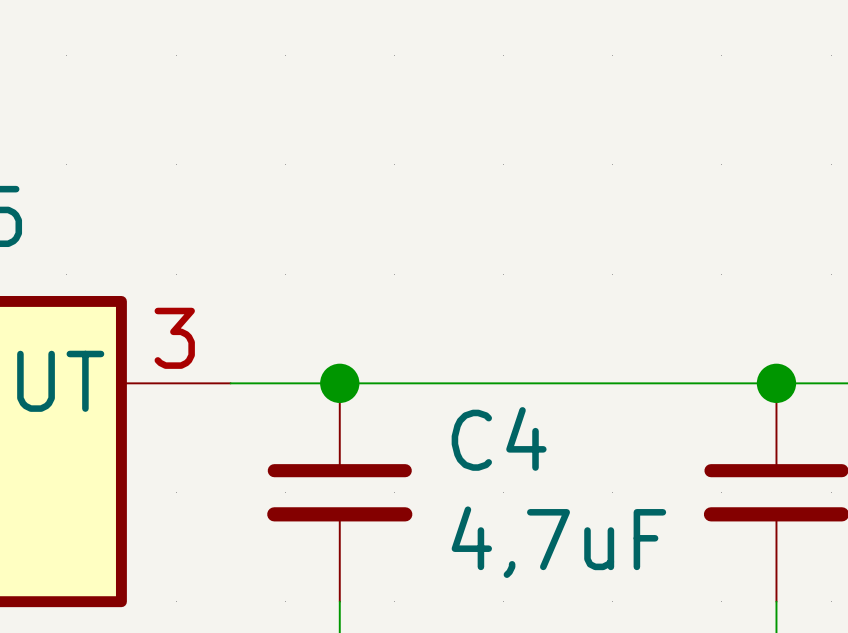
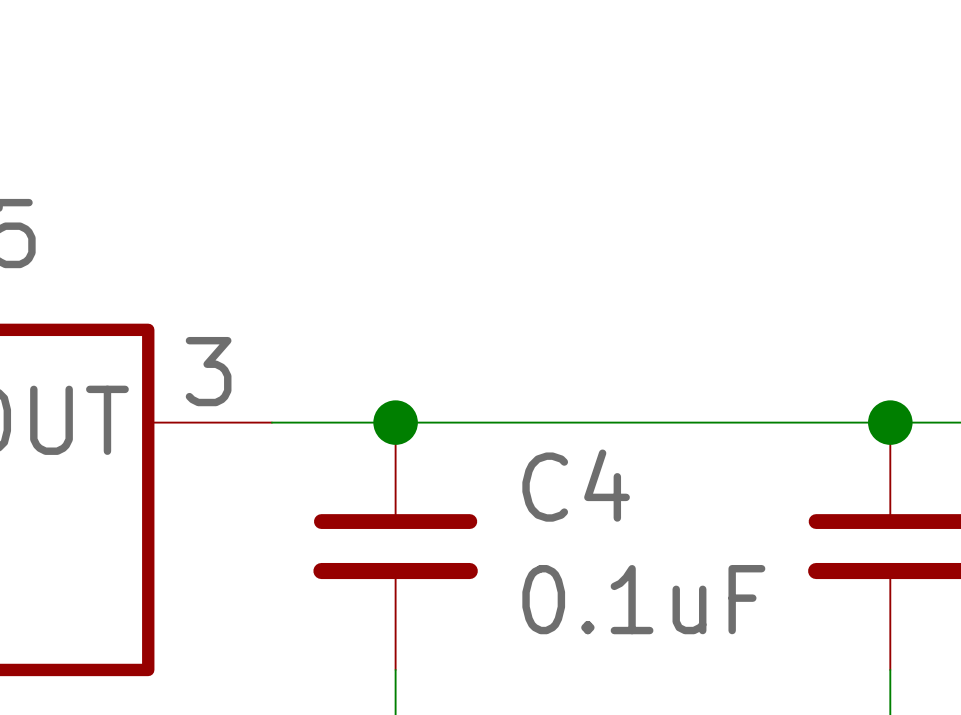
C4 value: 4,7uF (558, 542) -> 0.1uF (643, 599)

